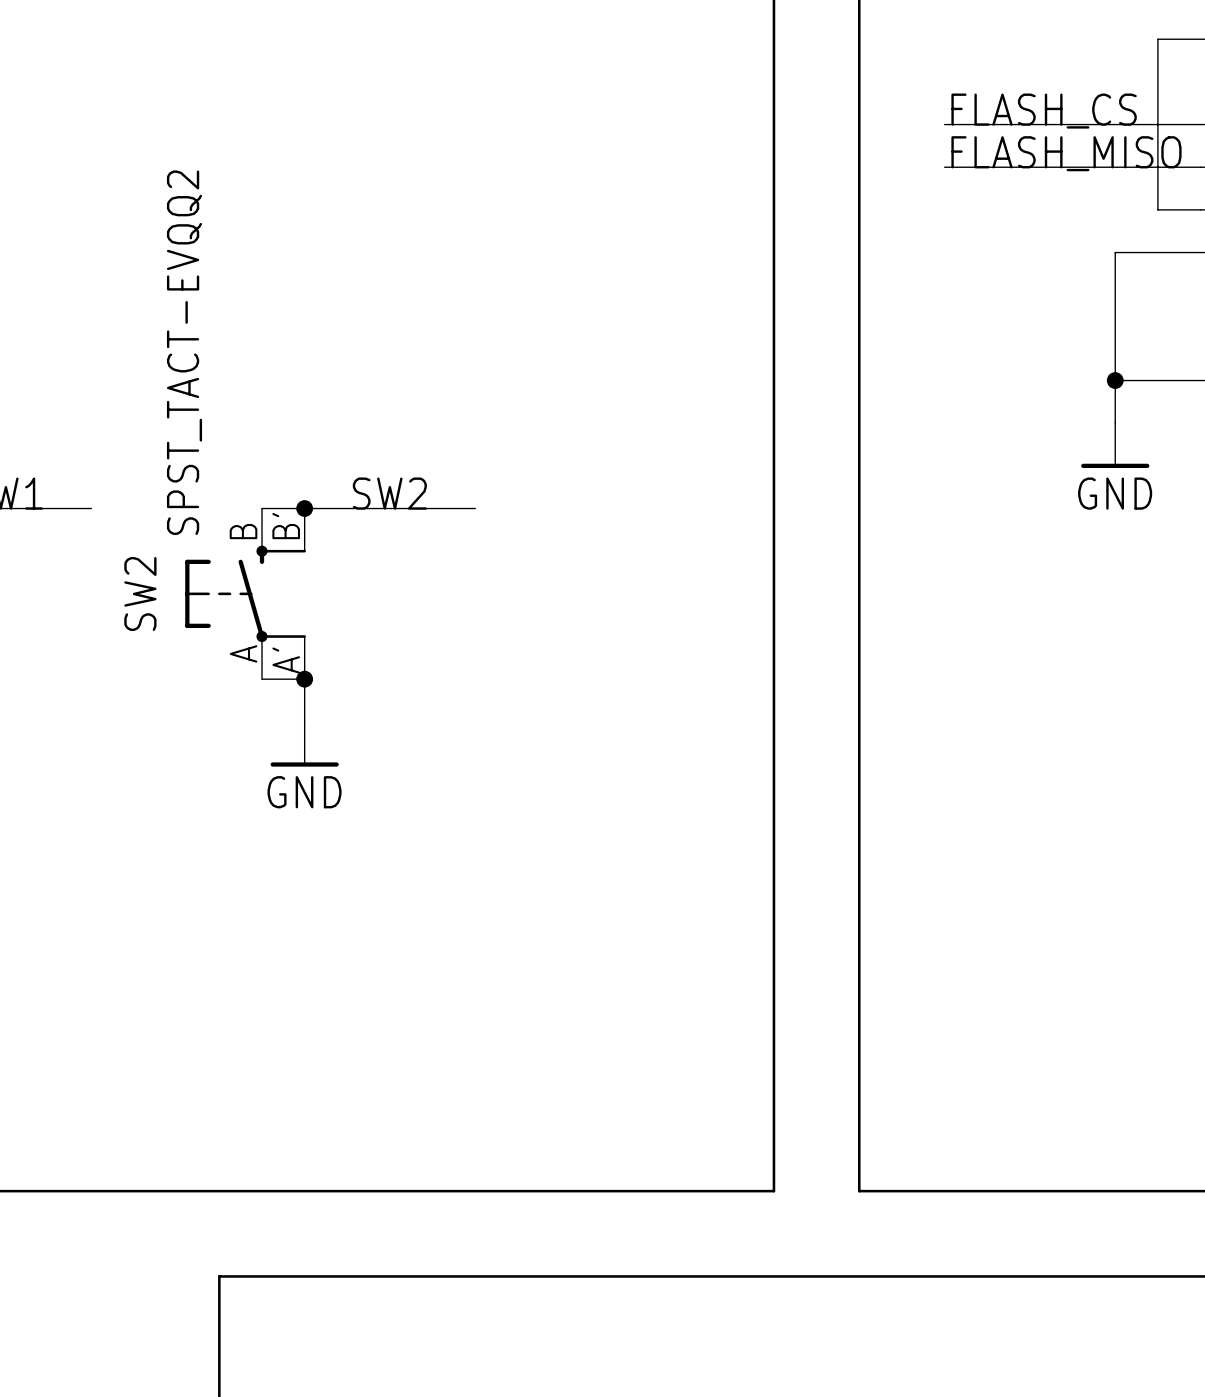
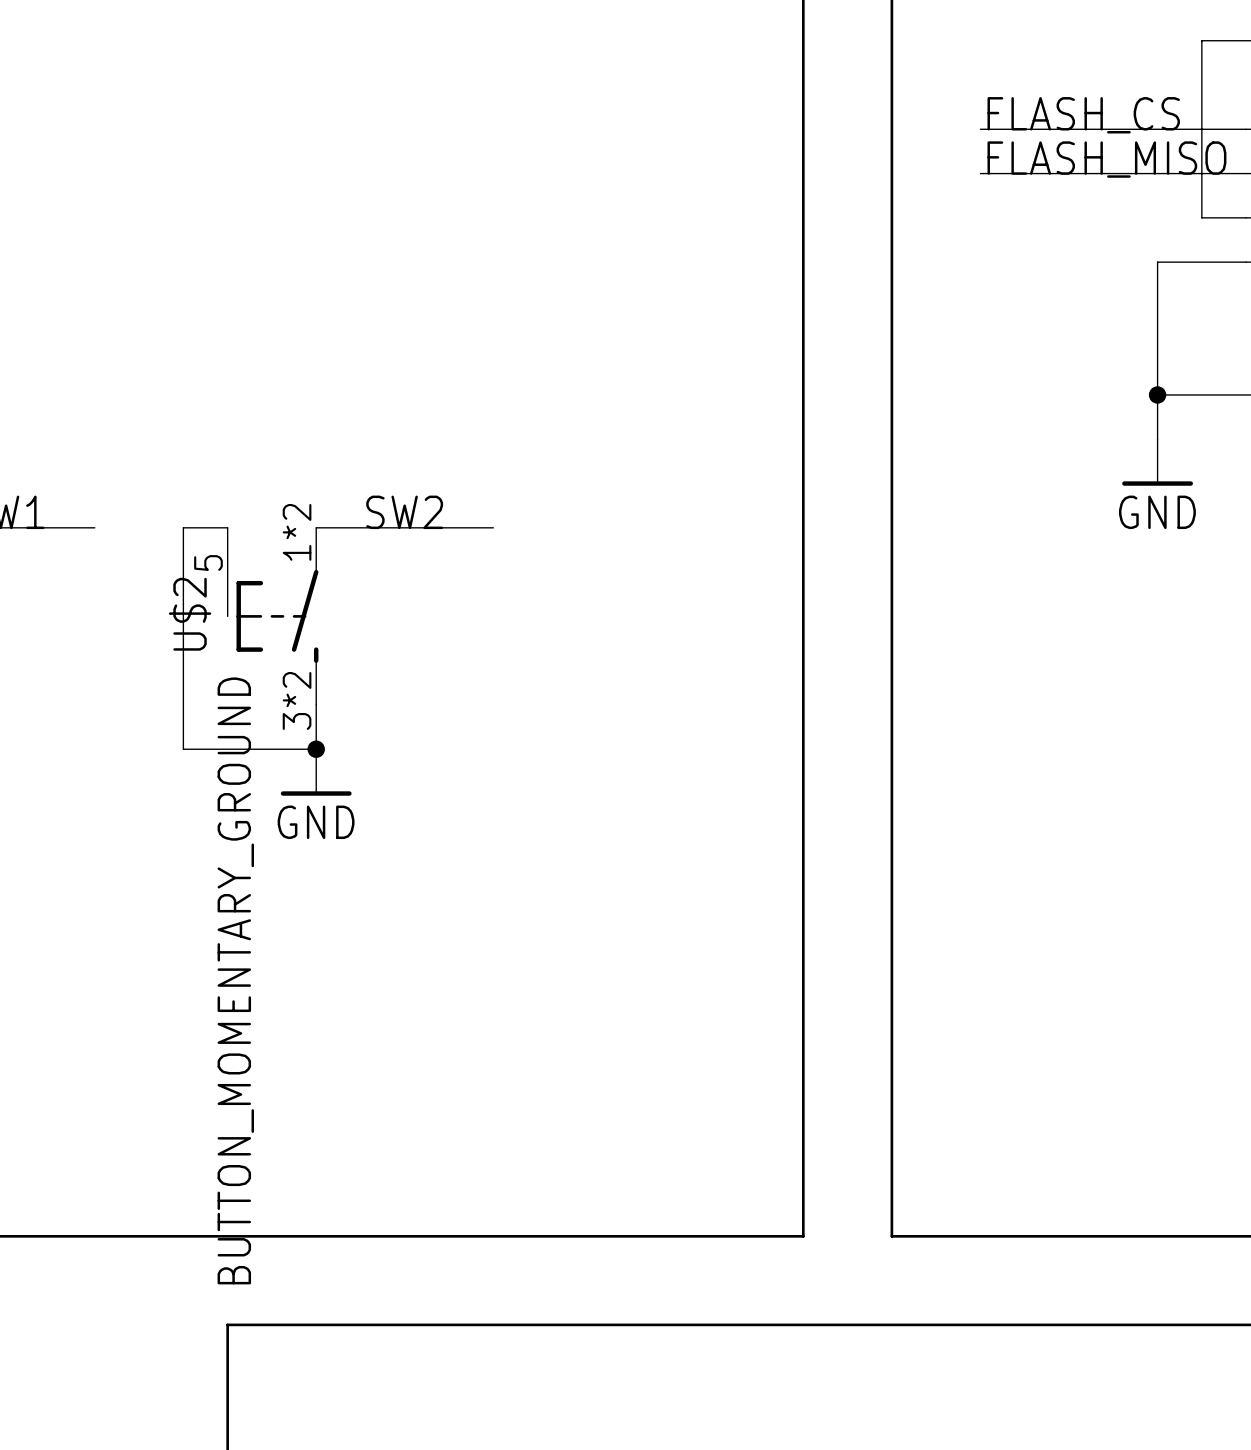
wire: none -> (227, 527) (183, 527) (183, 749) (316, 749)
wire: (262, 508) (304, 508) -> none
junction: (304, 508) -> none
SW2: SPST_TACT-EVQQ2 (245, 593) -> none
U$2: none -> BUTTON_MOMENTARY_GROUND (273, 616)
wire: (262, 679) (304, 679) -> none
junction position: (304, 679) -> (316, 749)

